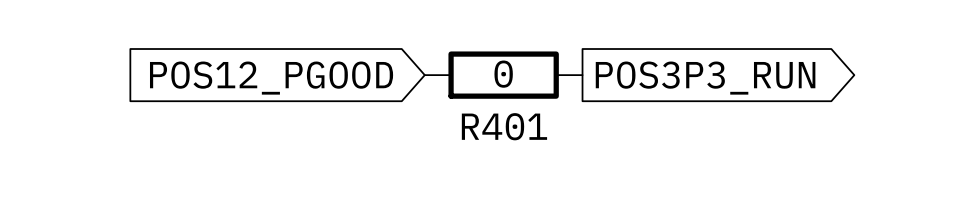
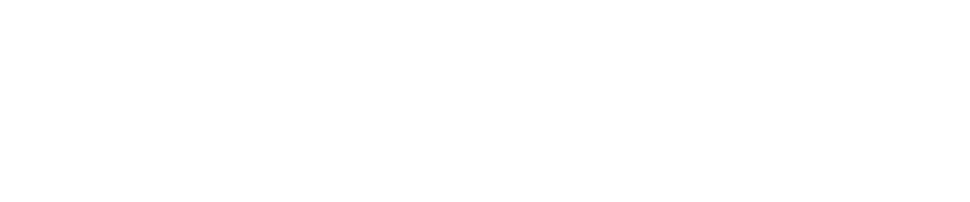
R401: 0 (503, 75) -> none
global label: POS12_PGOOD (271, 78) -> none
global label: POS3P3_RUN (705, 78) -> none

